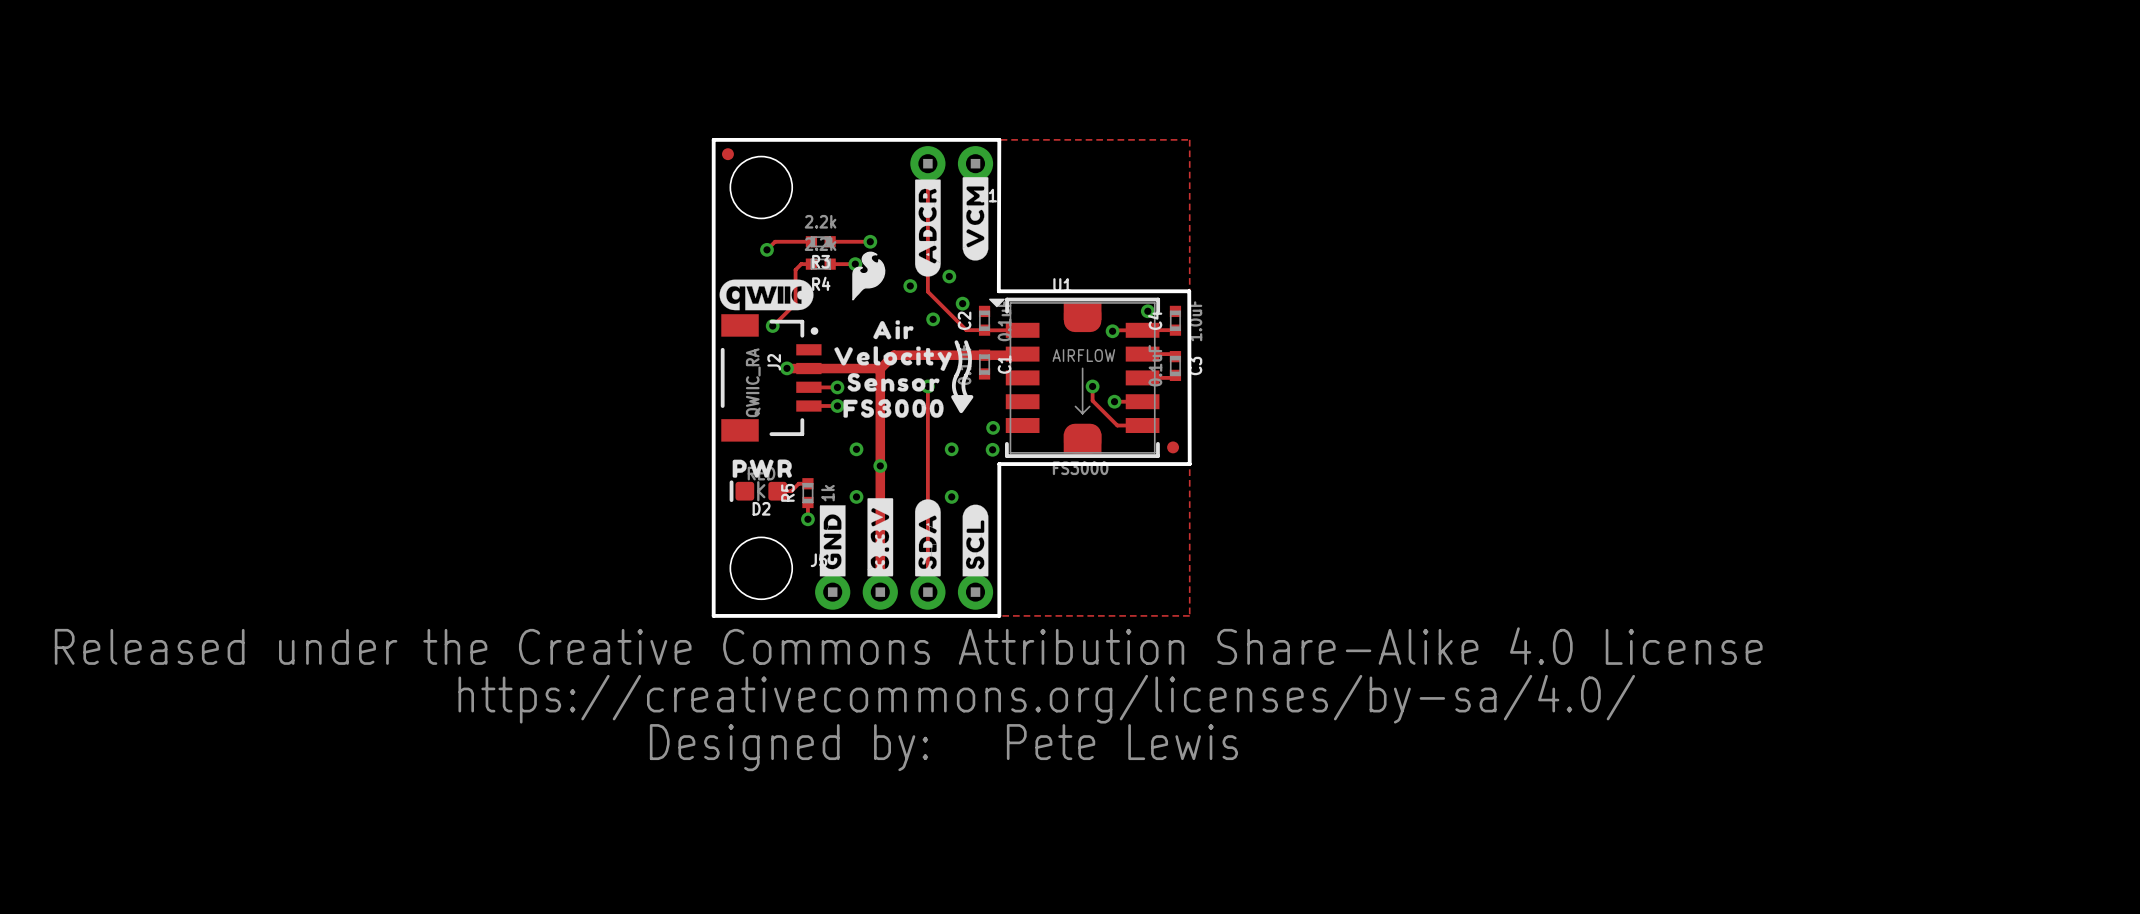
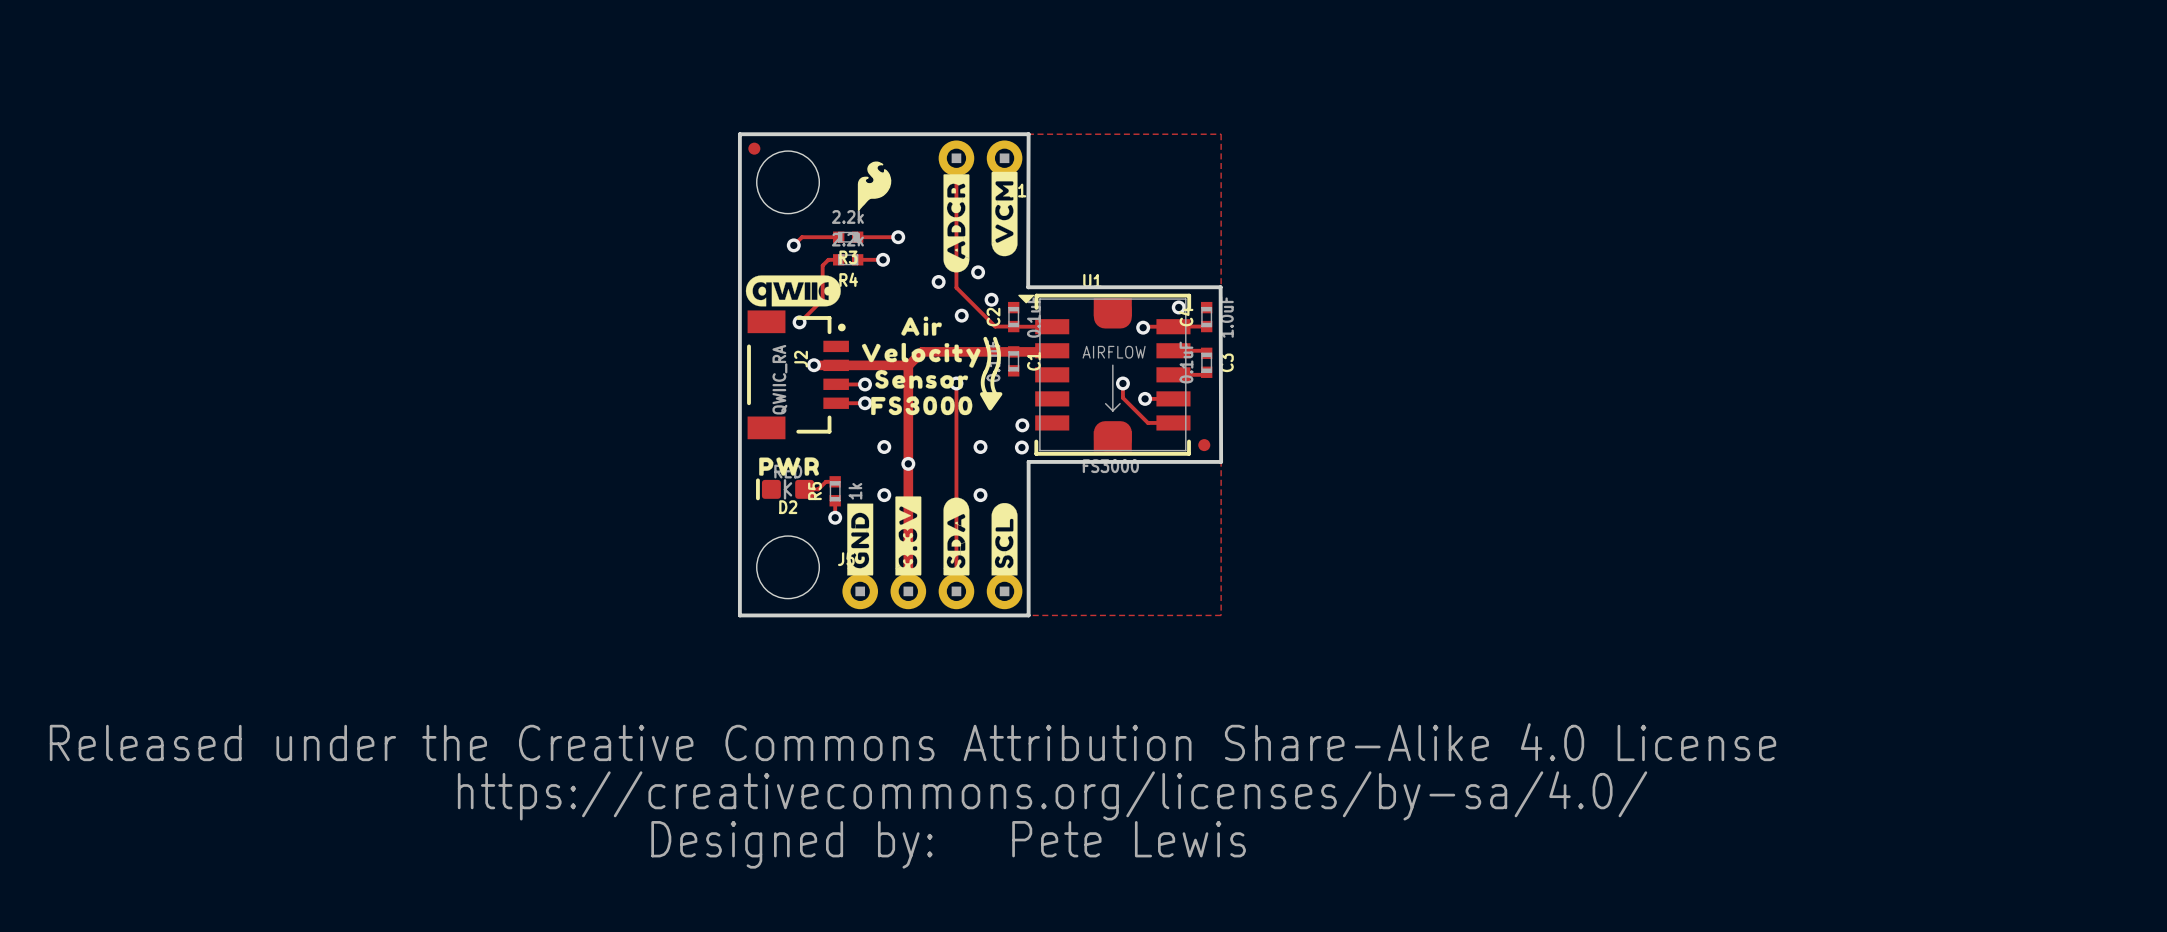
drawing position: (868, 276) -> (874, 186)
drawing position: (908, 699) -> (912, 795)
text position: Pete Lewis (1122, 742) -> Pete Lewis (1129, 839)

